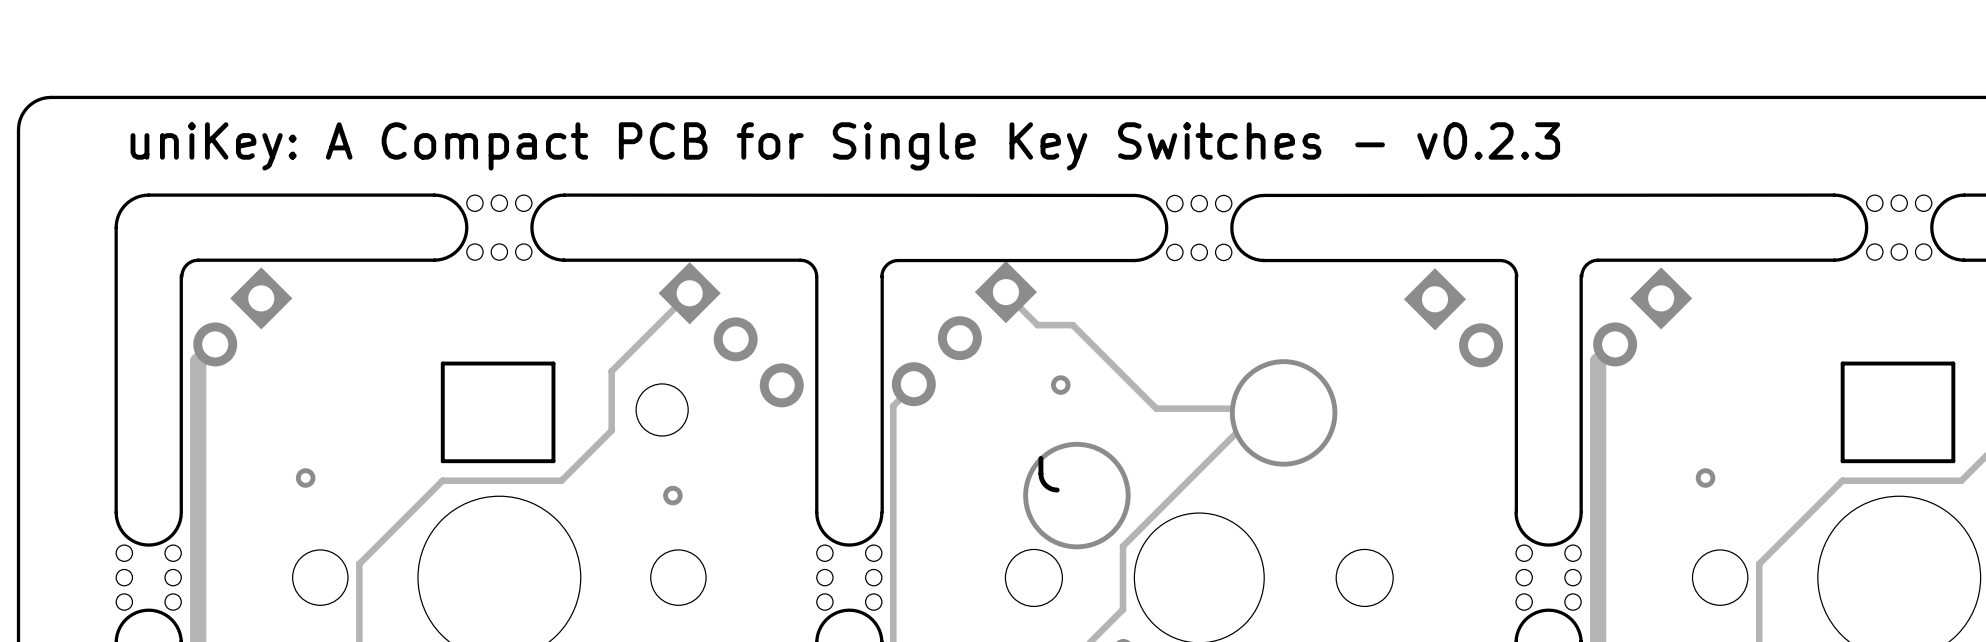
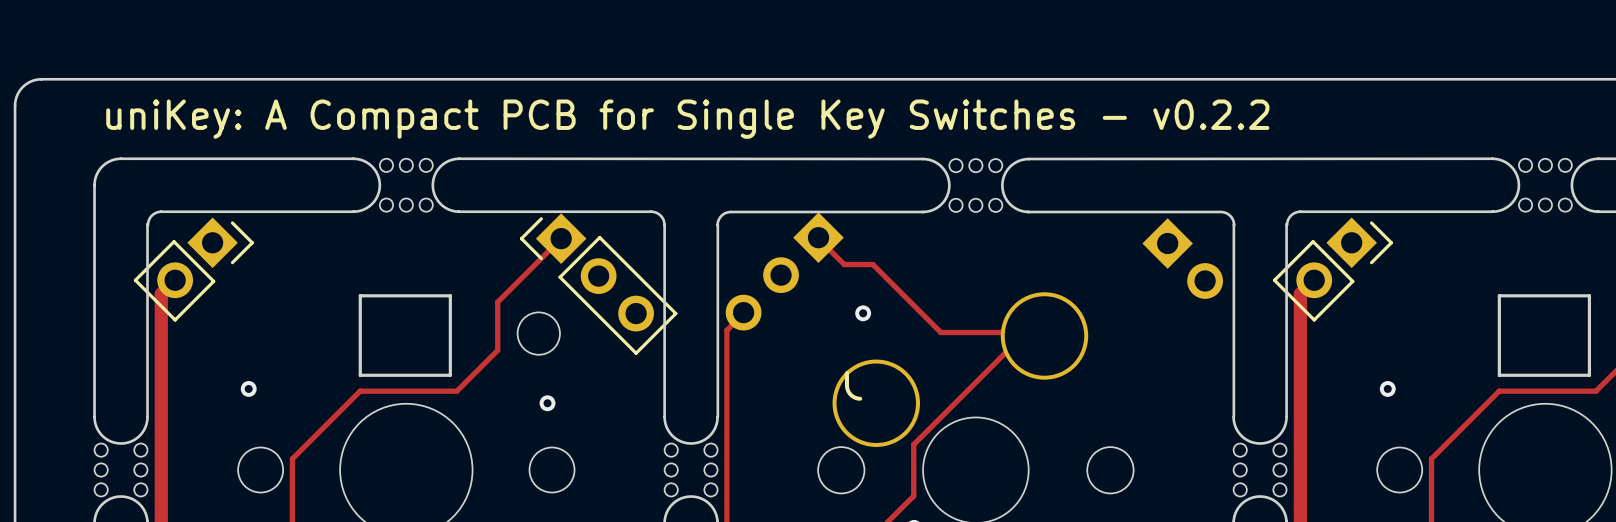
text: uniKey: A Compact PCB for Single Key Switches - v0.2.3 (845, 146) -> uniKey: A Compact PCB for Single Key Switches - v0.2.2 (687, 119)
part side: bottom (242, 316) -> top (193, 269)
part side: bottom (1642, 316) -> top (1332, 269)
part side: bottom (731, 334) -> top (598, 284)

